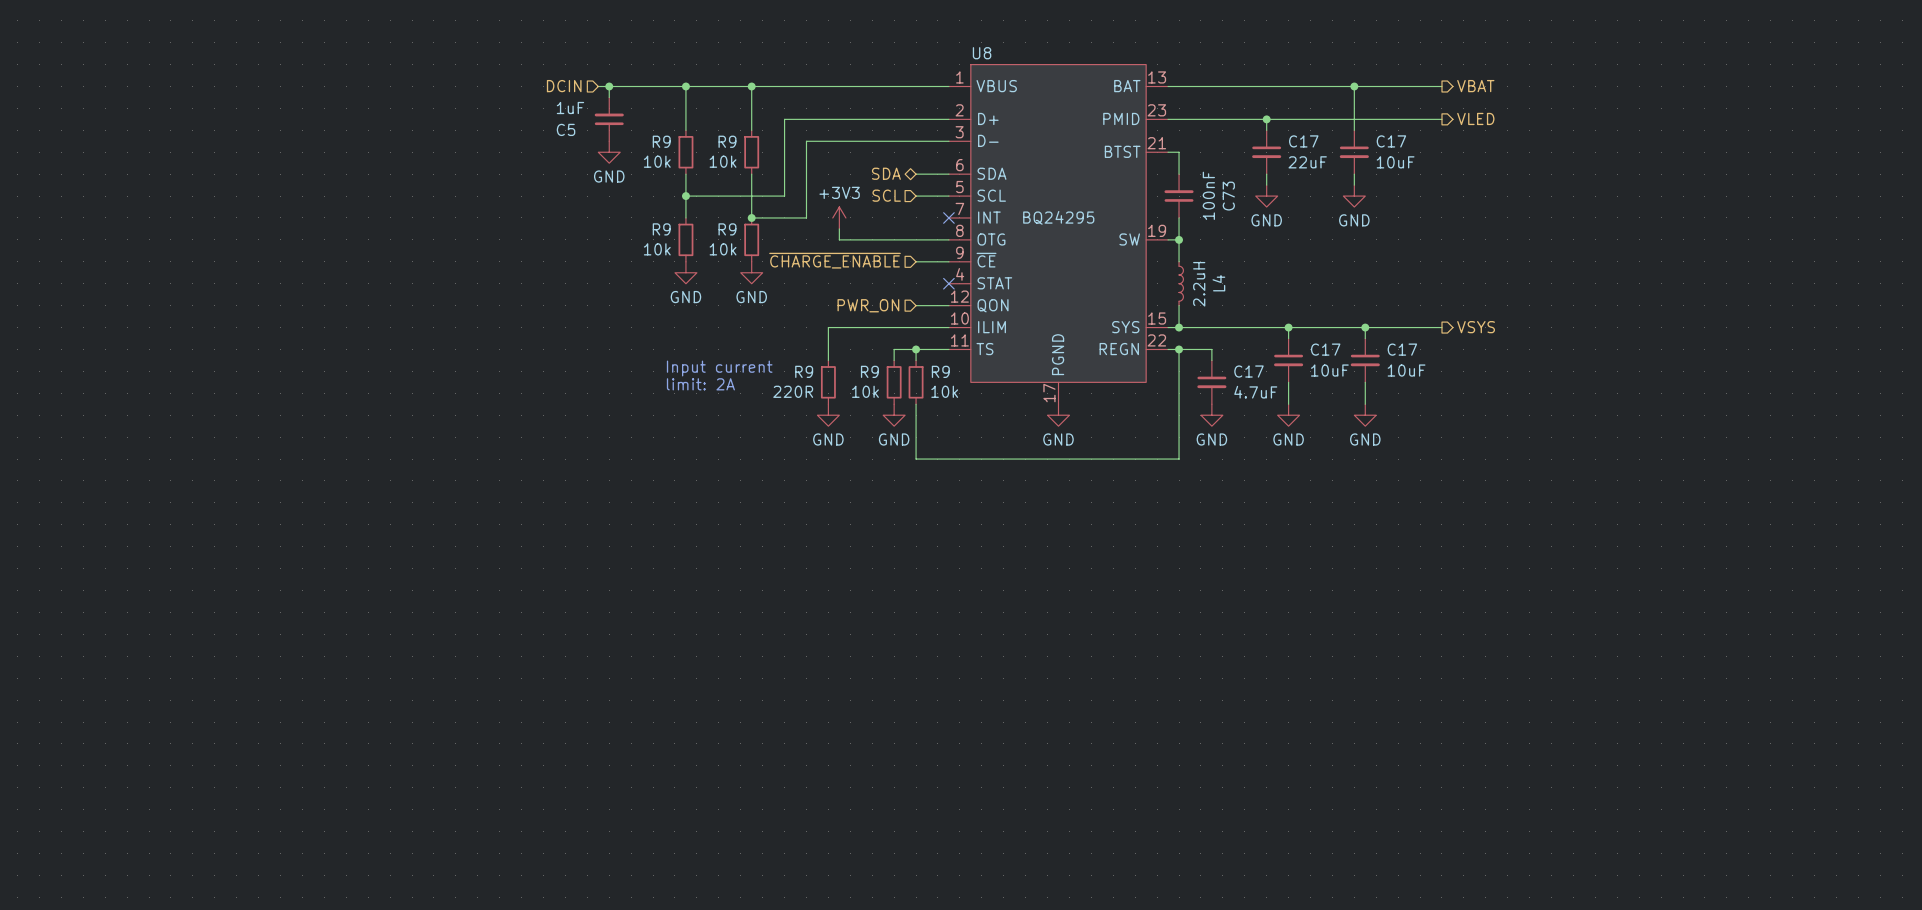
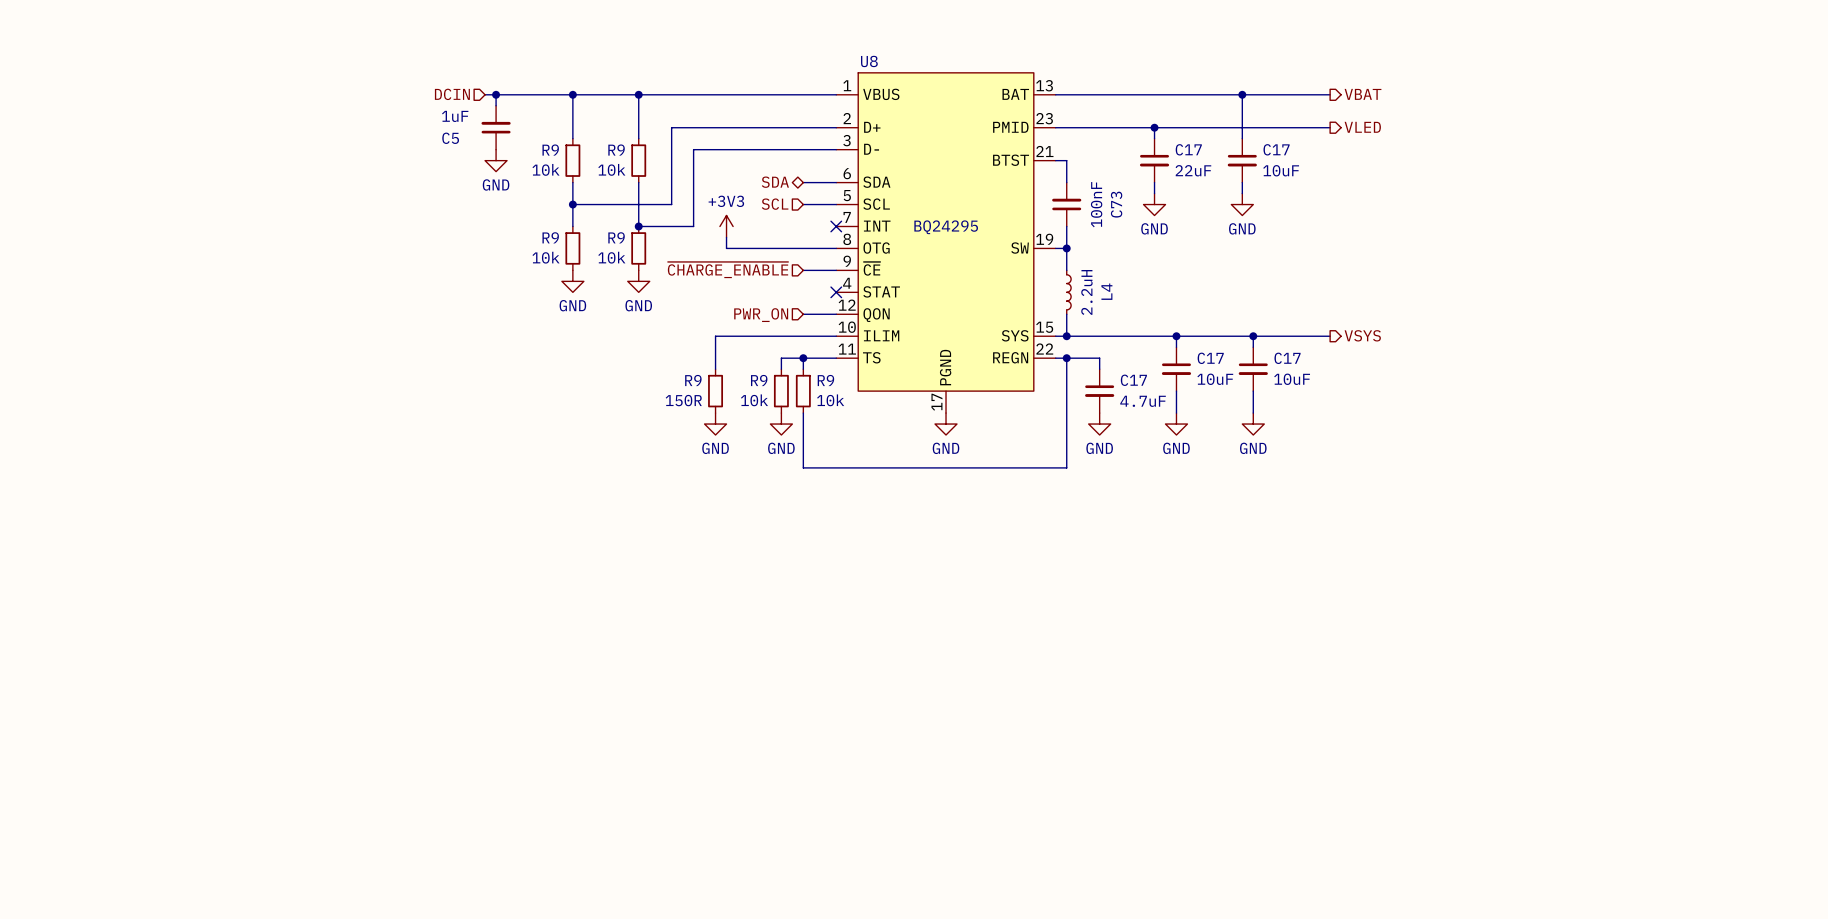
text: Input current (719, 368) -> none
text: limit: 2A (700, 384) -> none
R9 value: 220R (793, 391) -> 150R (683, 400)

